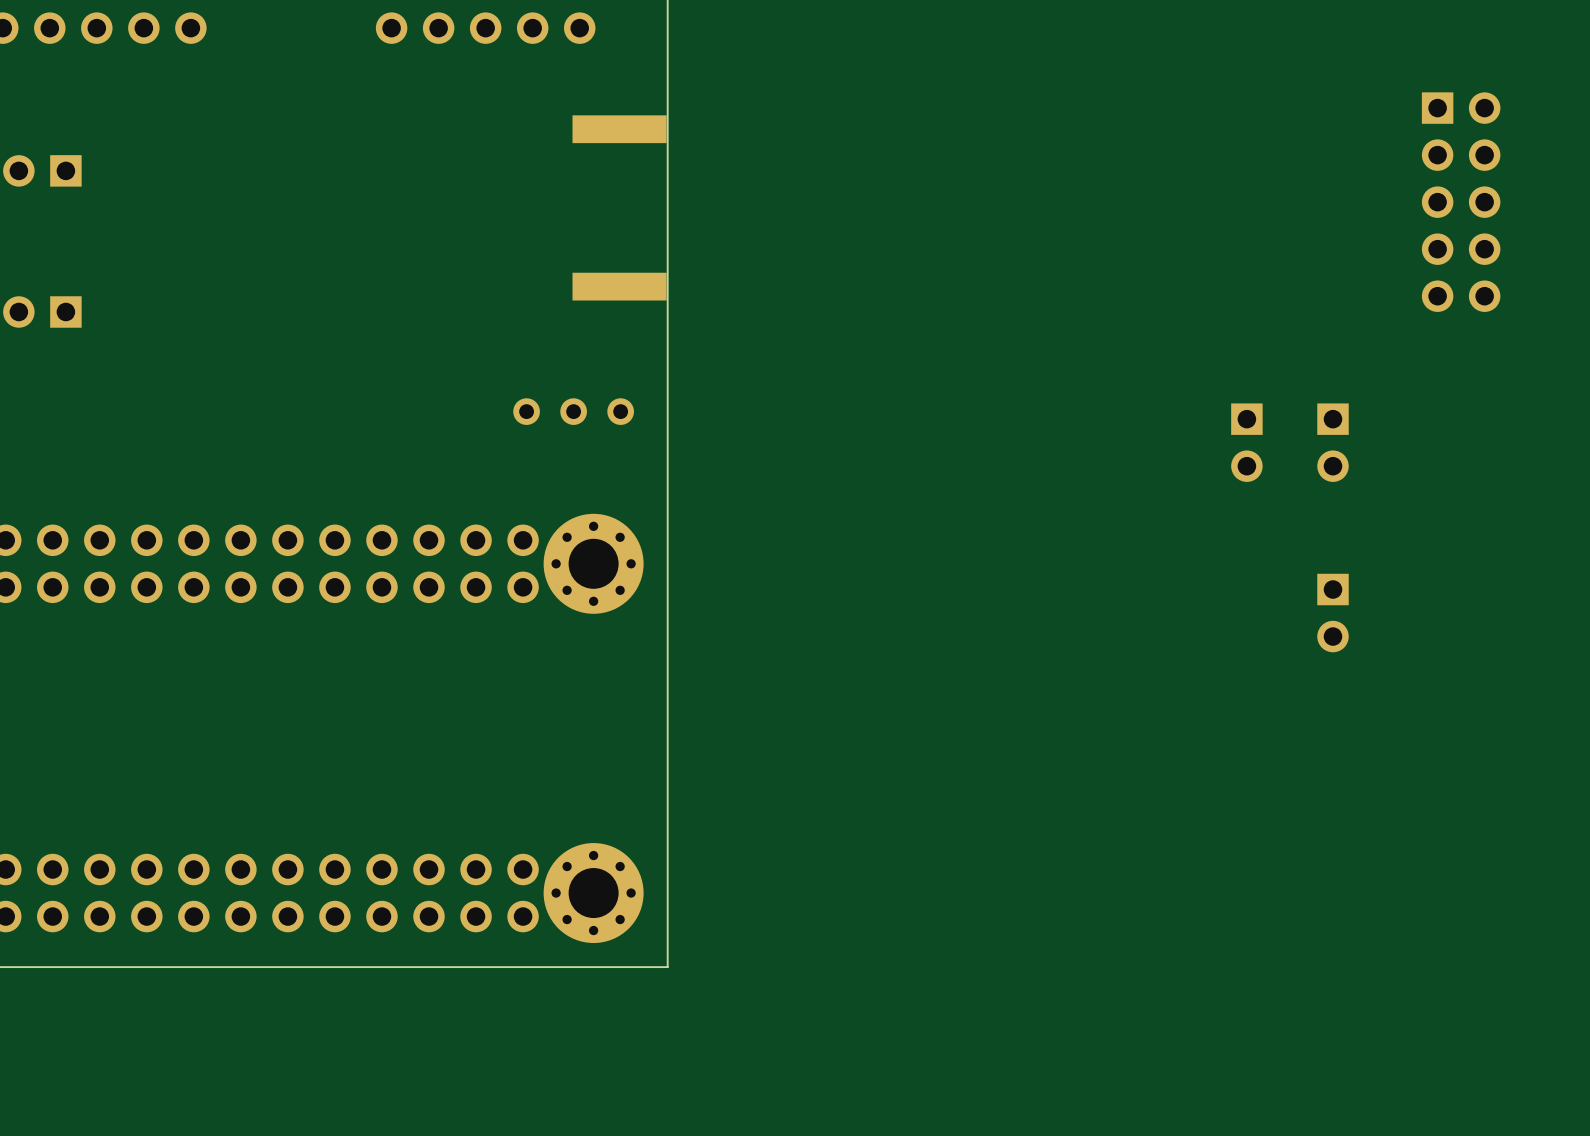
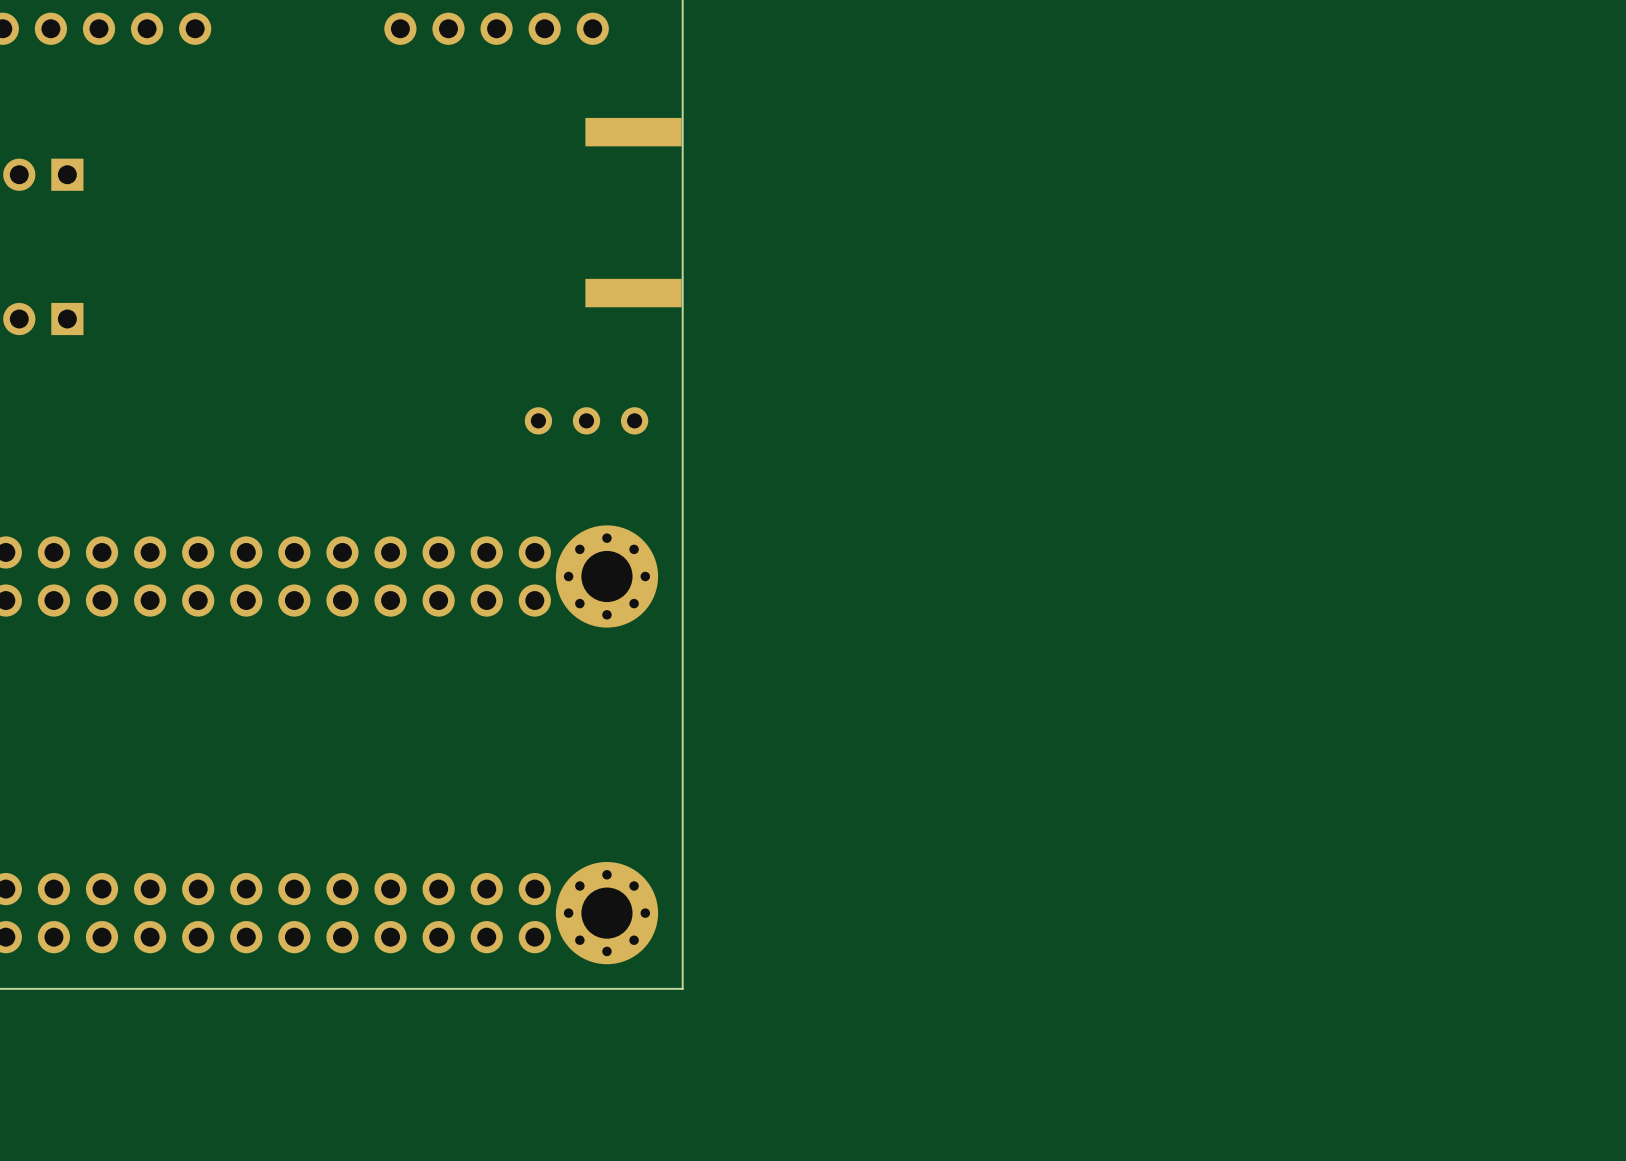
part: (1461, 202) -> none
part: (1246, 442) -> none
part: (1333, 442) -> none
part: (1333, 613) -> none

